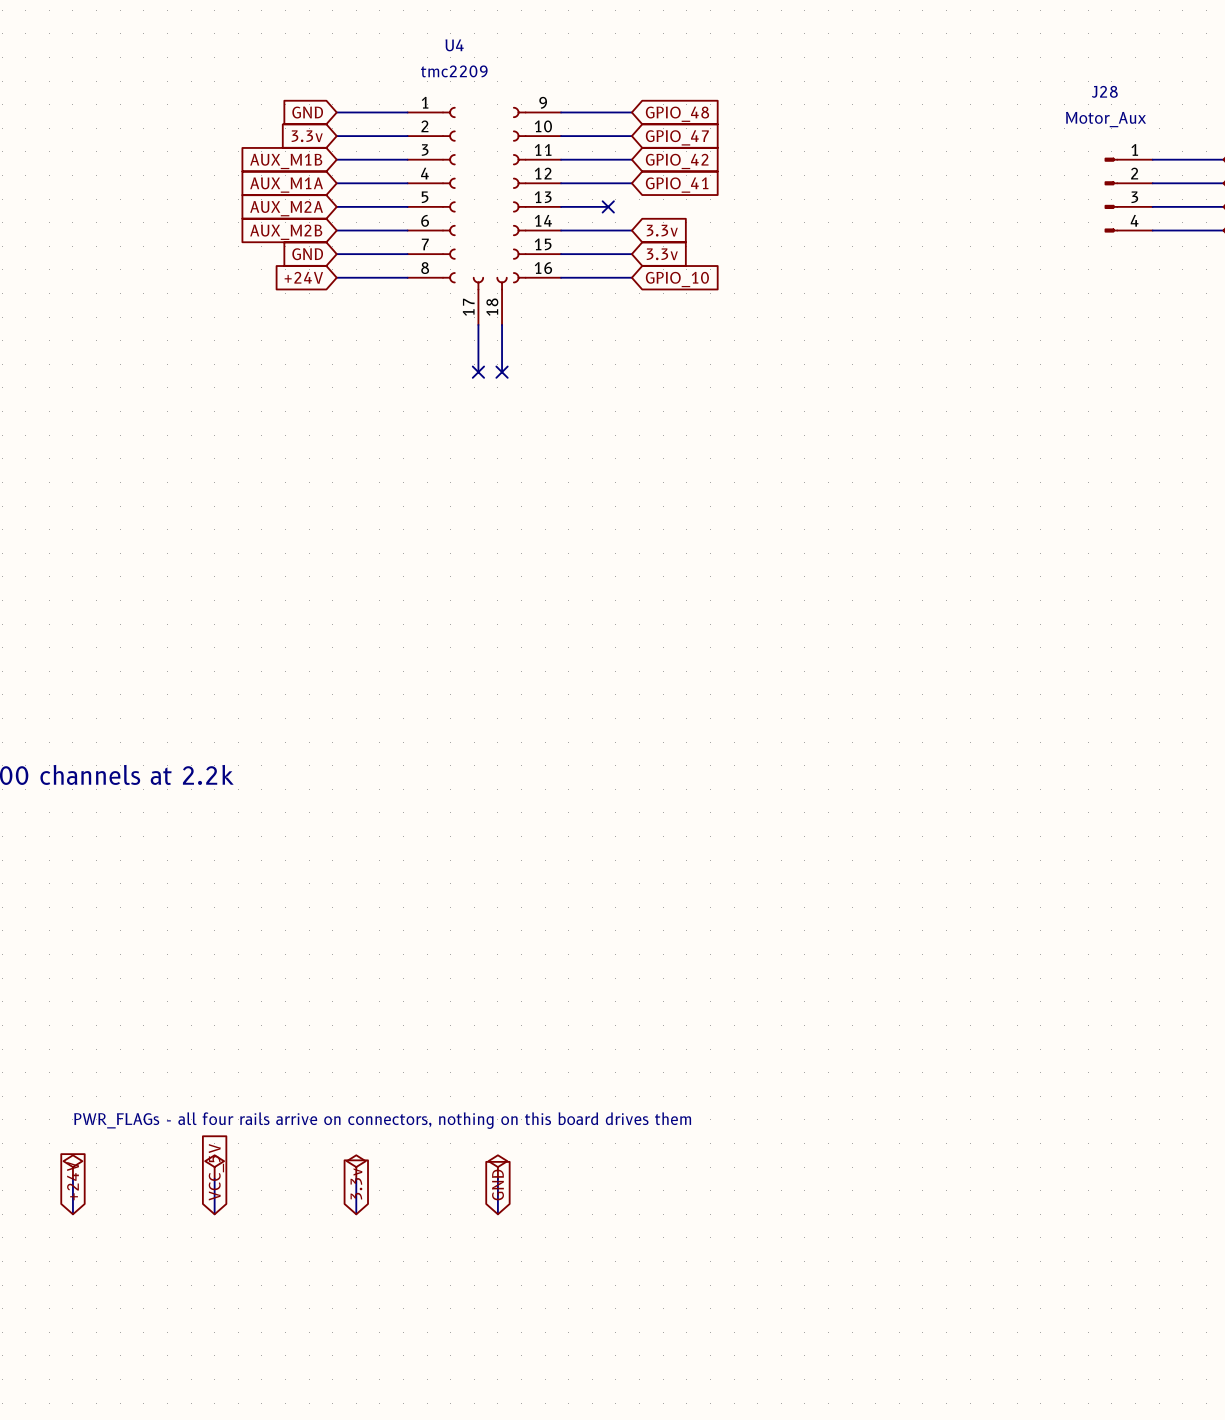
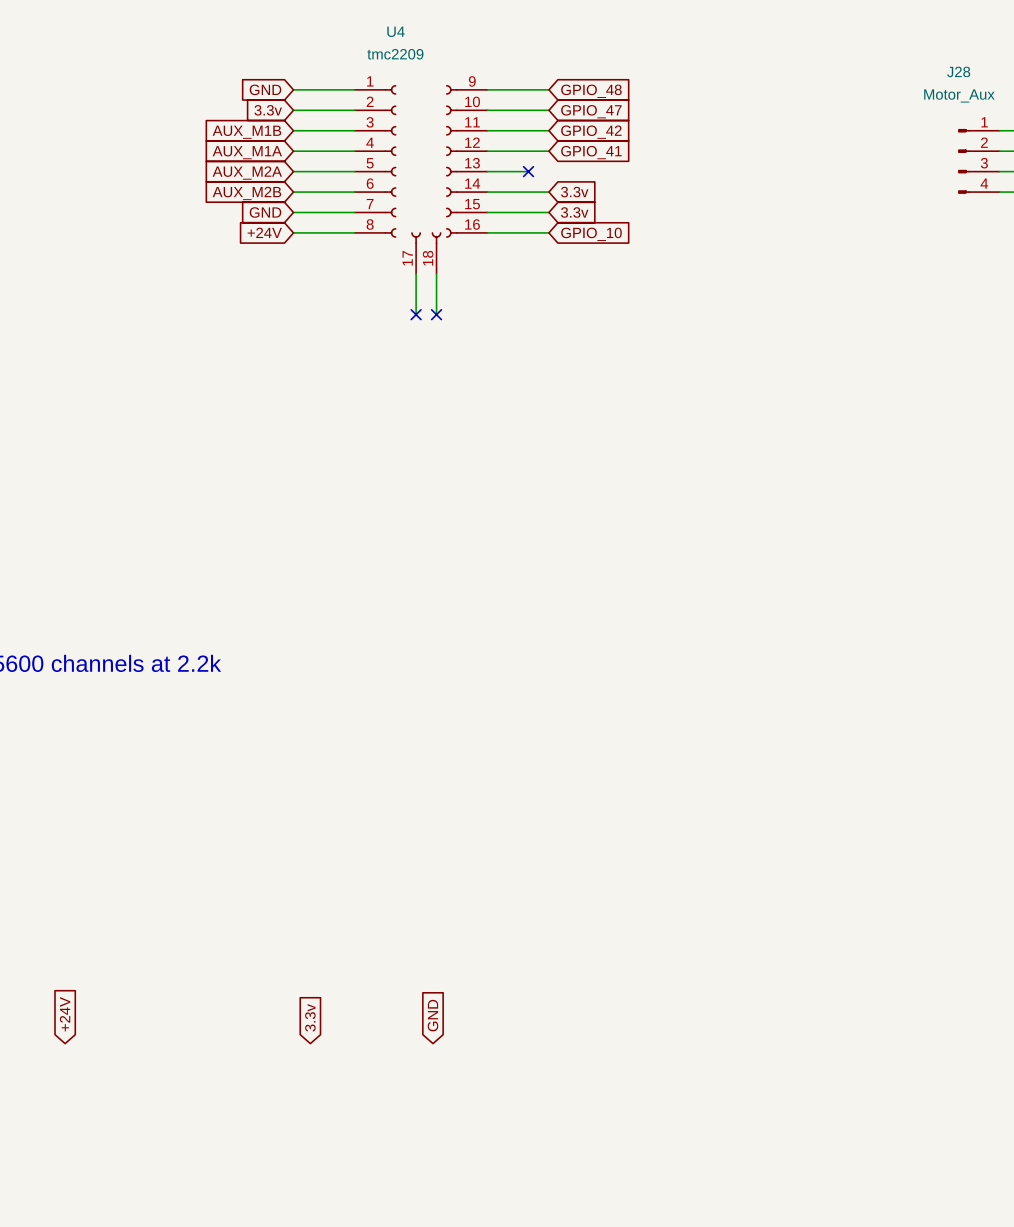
text: PWR_FLAGs - all four rails arrive on connectors, nothing on this board drives them (382, 1120) -> none
power symbol: (72, 1167) -> none
power symbol: (214, 1167) -> none
power symbol: (356, 1167) -> none
power symbol: (497, 1167) -> none
global label: VCC_5V (216, 1172) -> none
wire: (72, 1178) (72, 1214) -> none
wire: (214, 1178) (214, 1214) -> none
wire: (356, 1178) (356, 1214) -> none
wire: (497, 1178) (497, 1214) -> none

